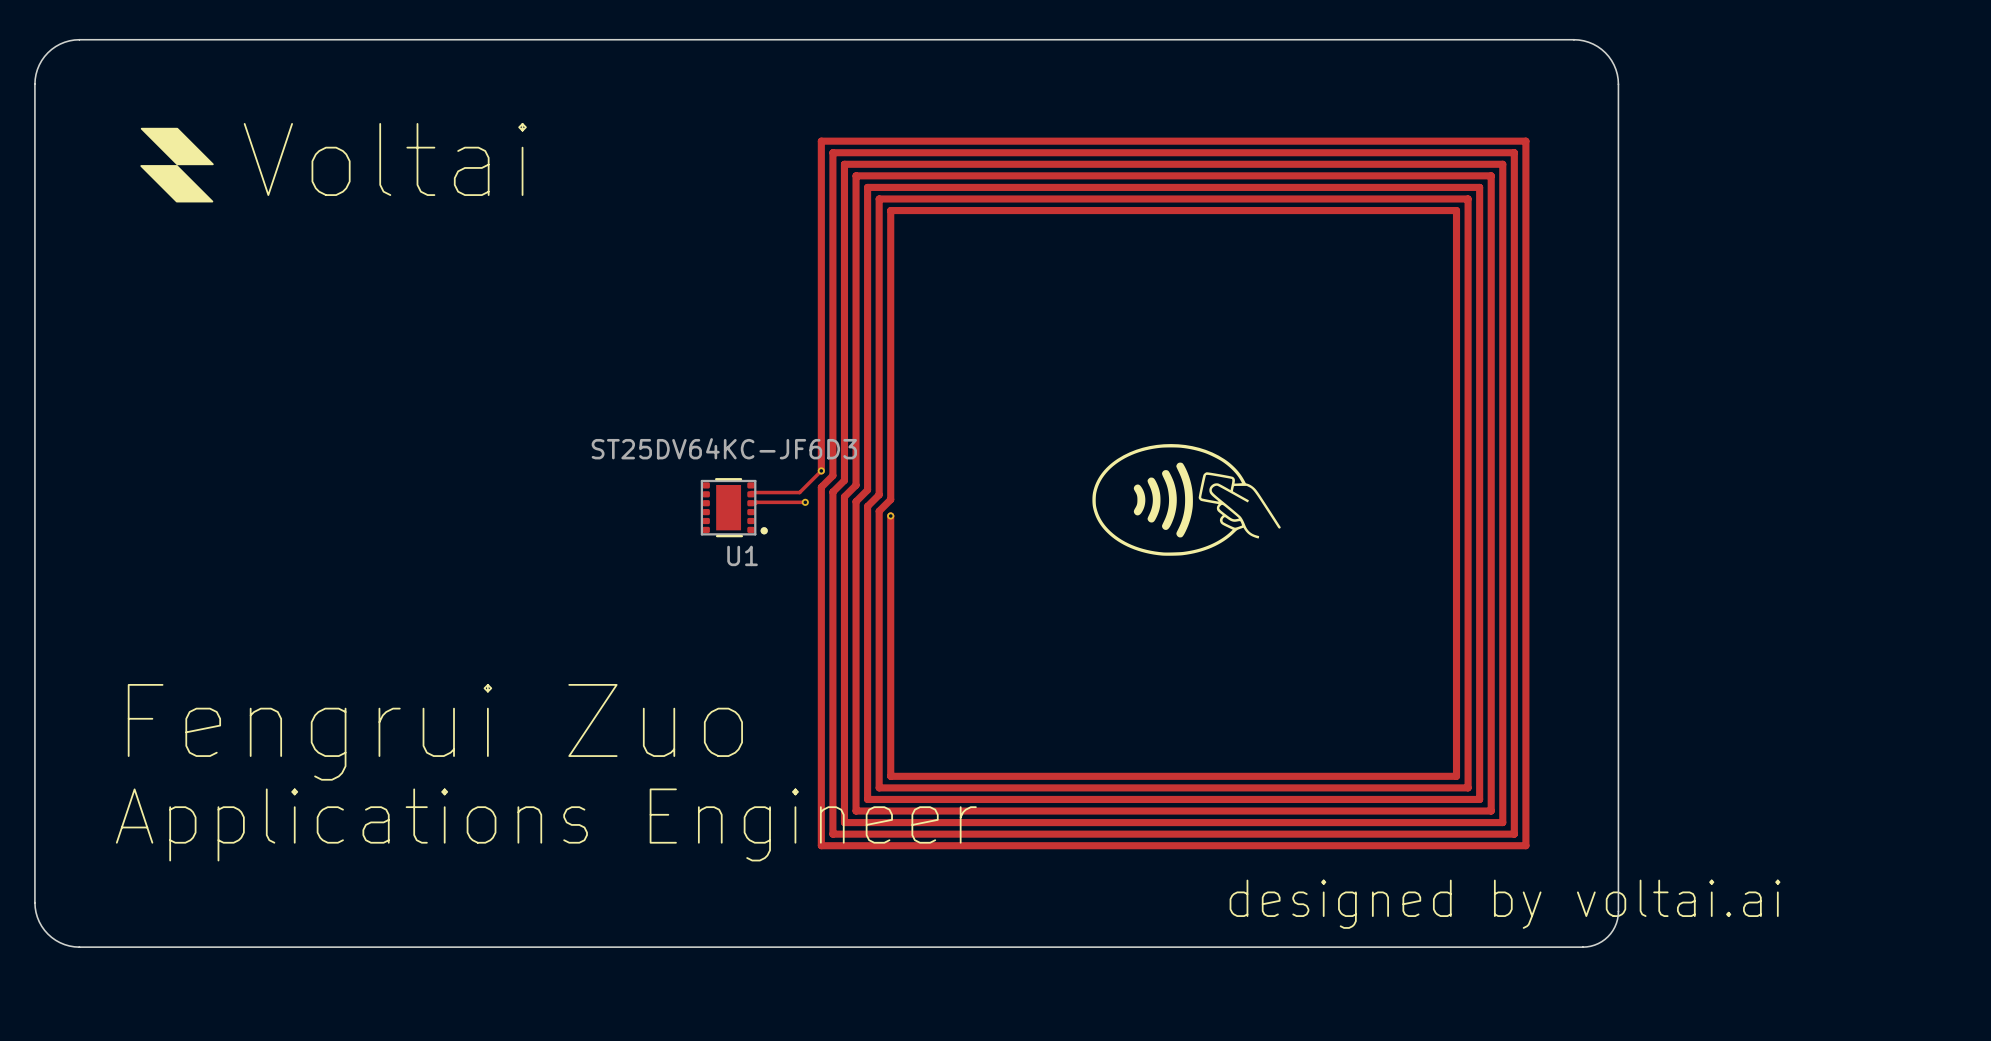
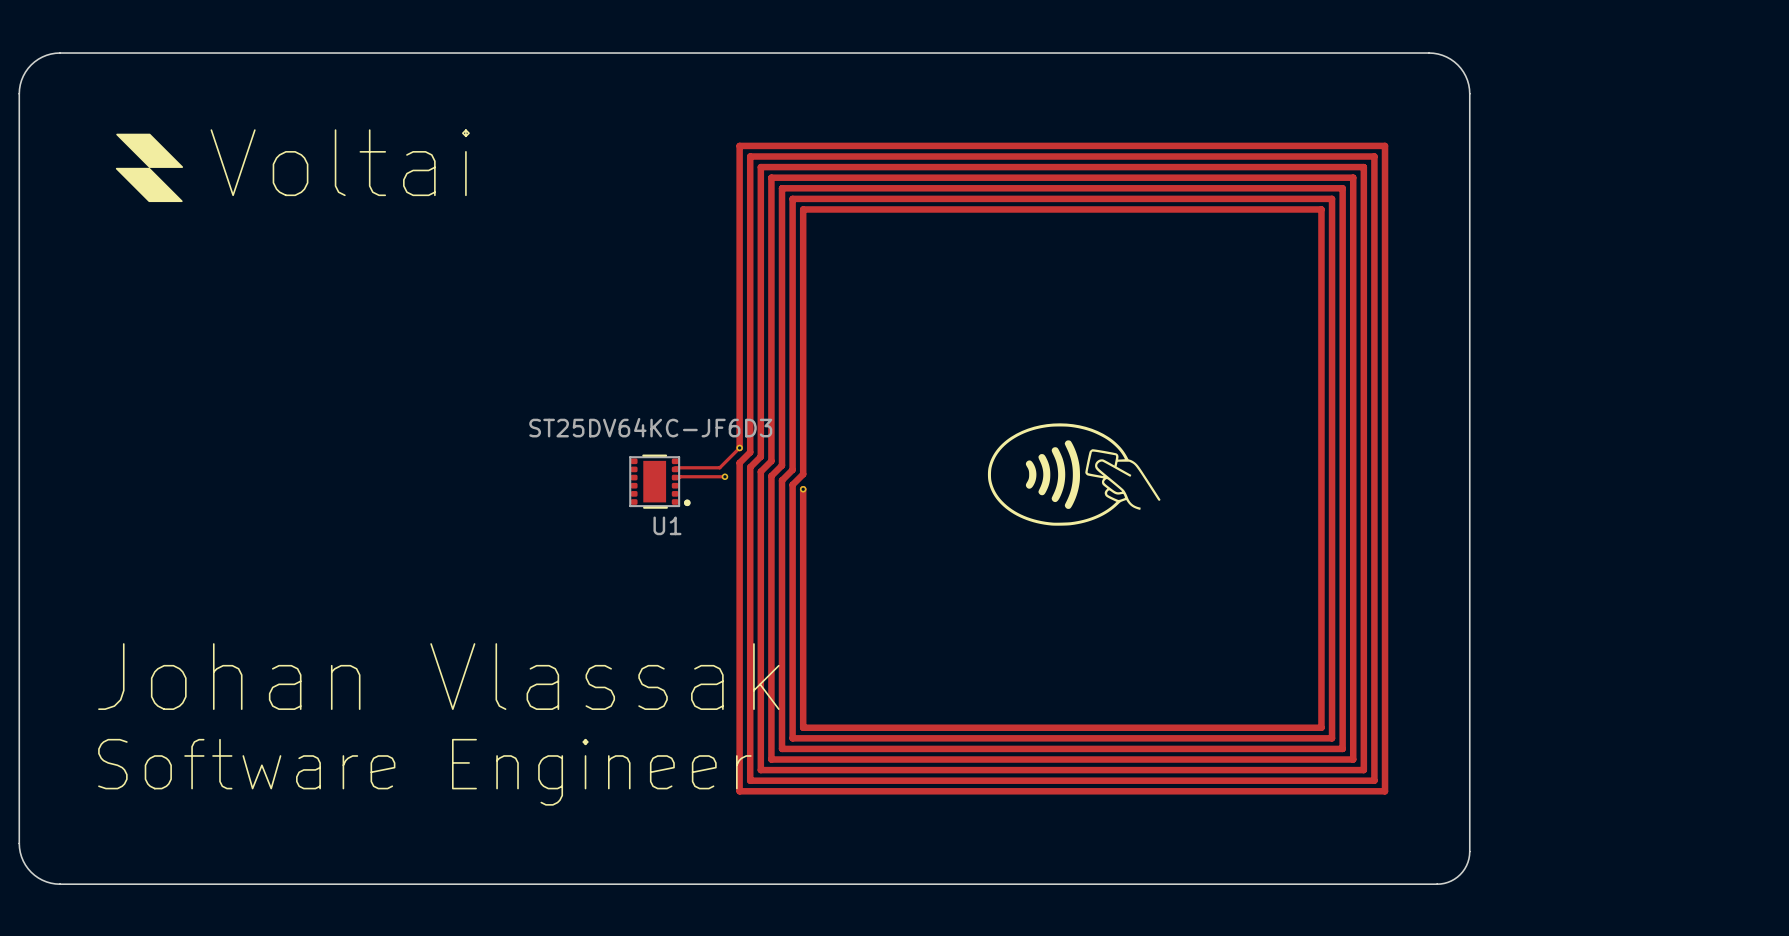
text: Fengrui Zuo (435, 732) -> Johan Vlassak (438, 676)
text: Applications Engineer (546, 824) -> Software Engineer (424, 772)
text: designed by voltai.ai (1505, 904) -> none

